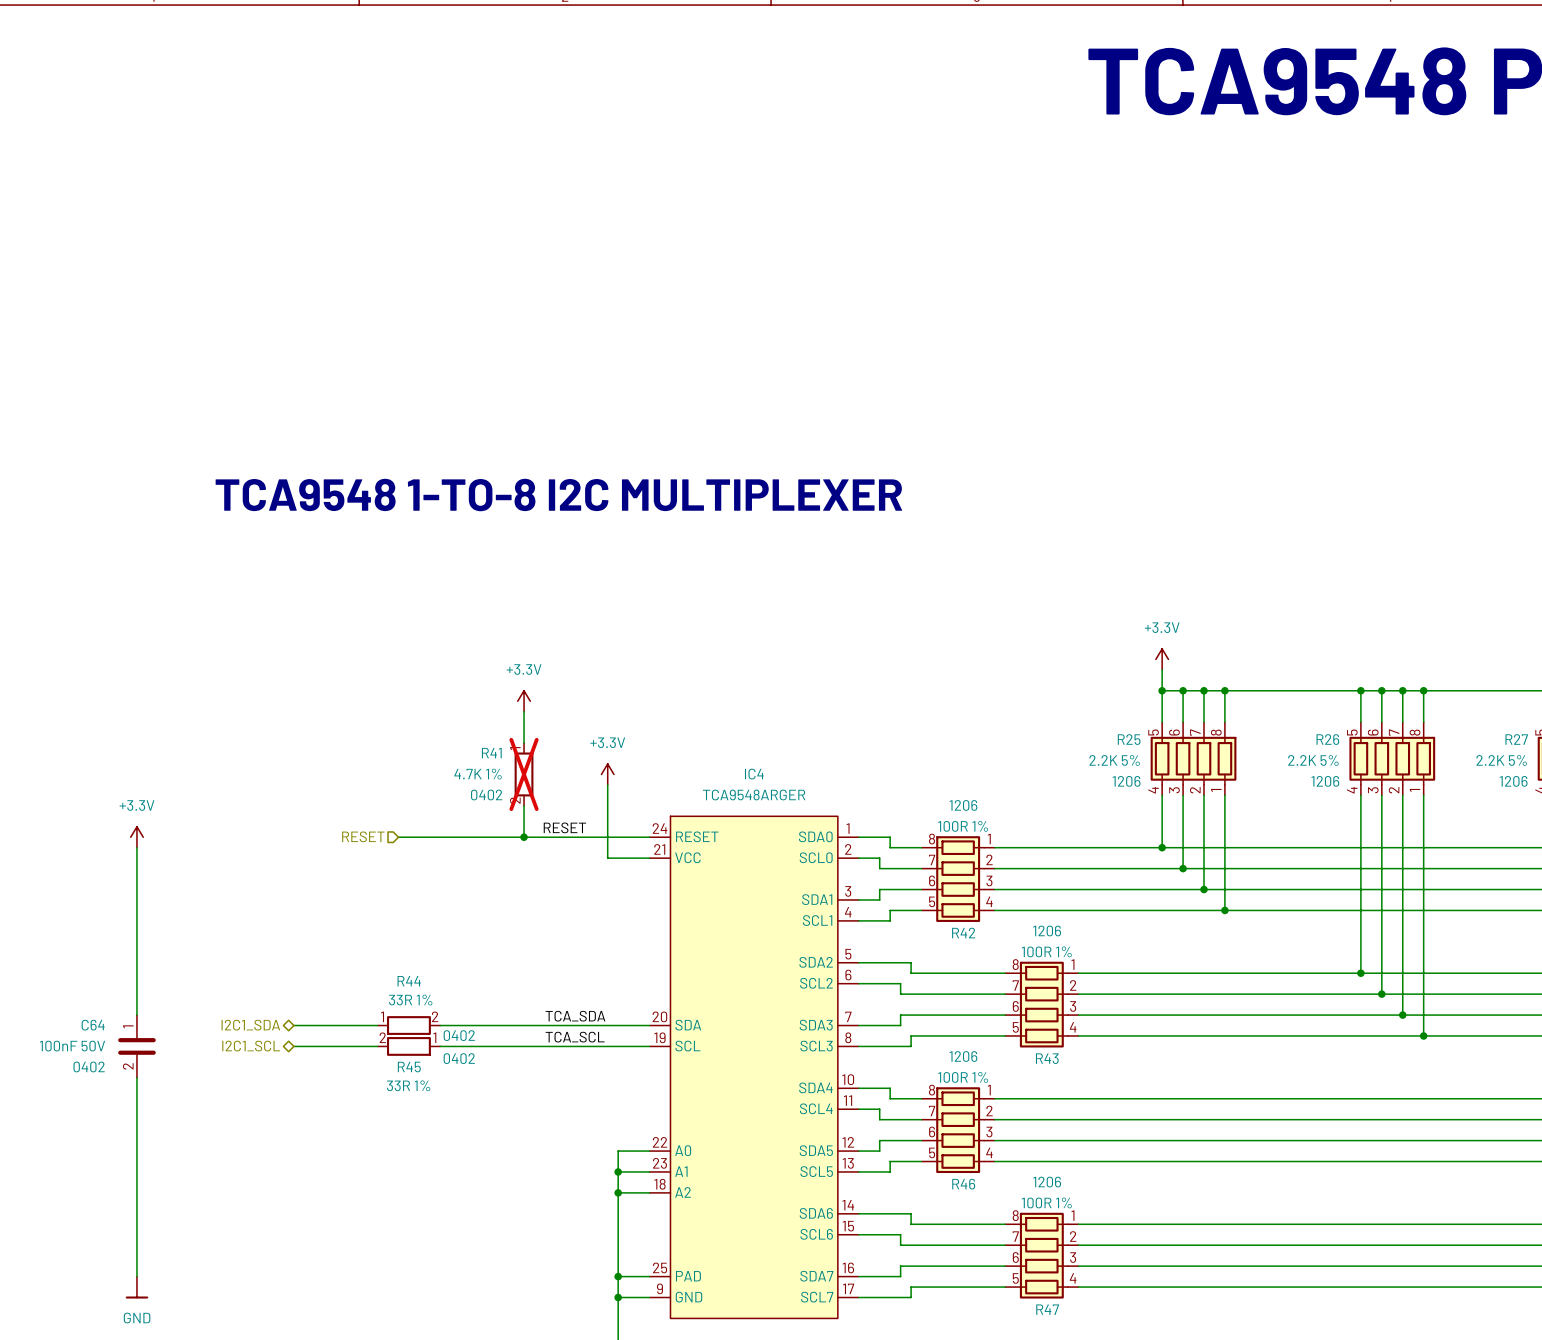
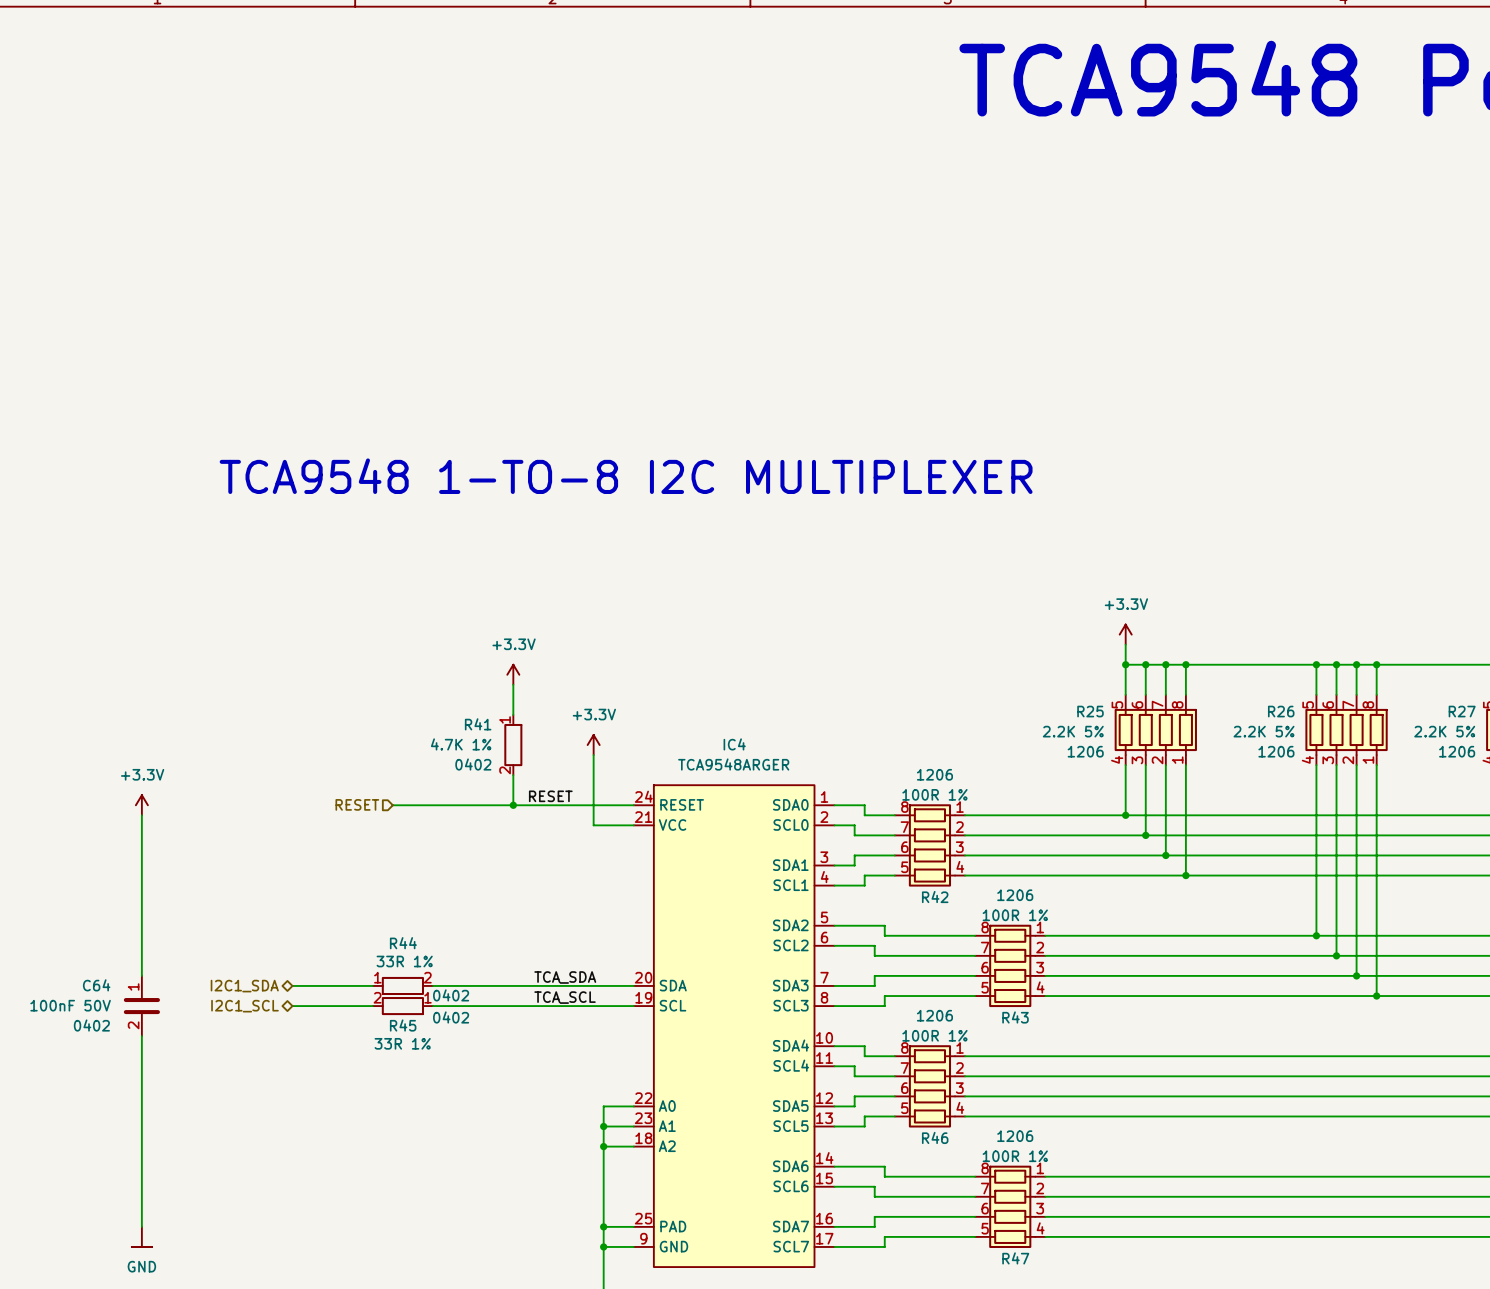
R41 do-not-place cross: (524, 774) -> none

